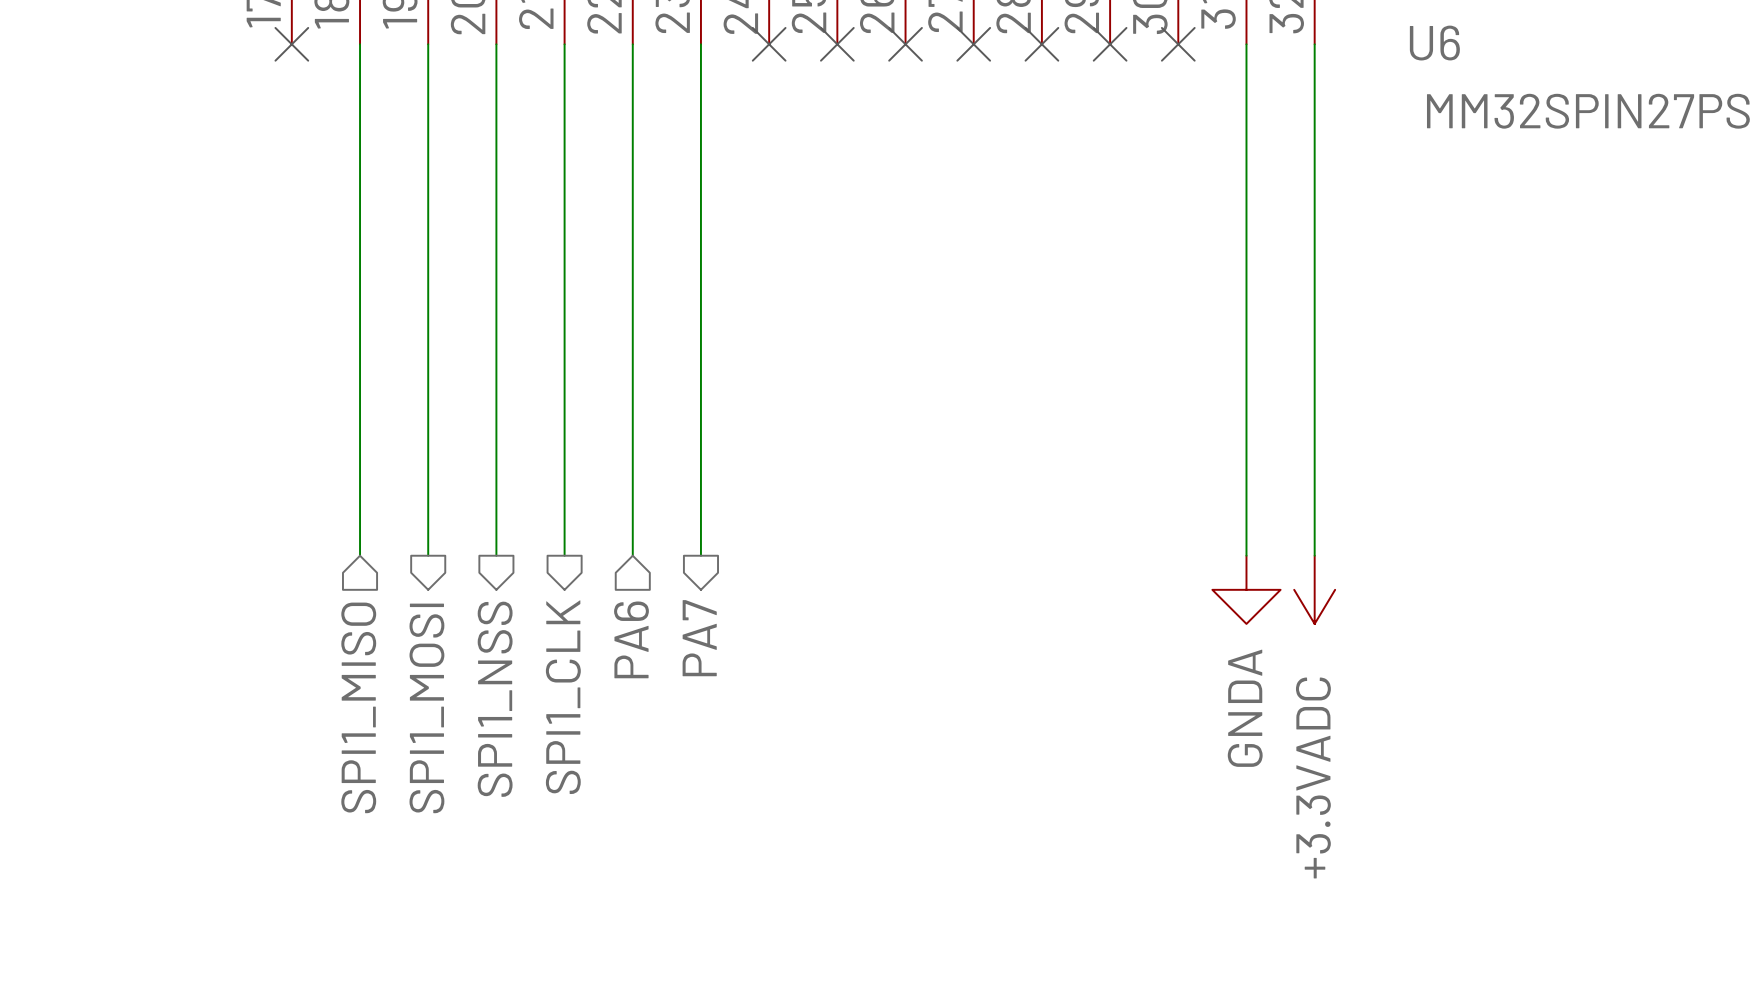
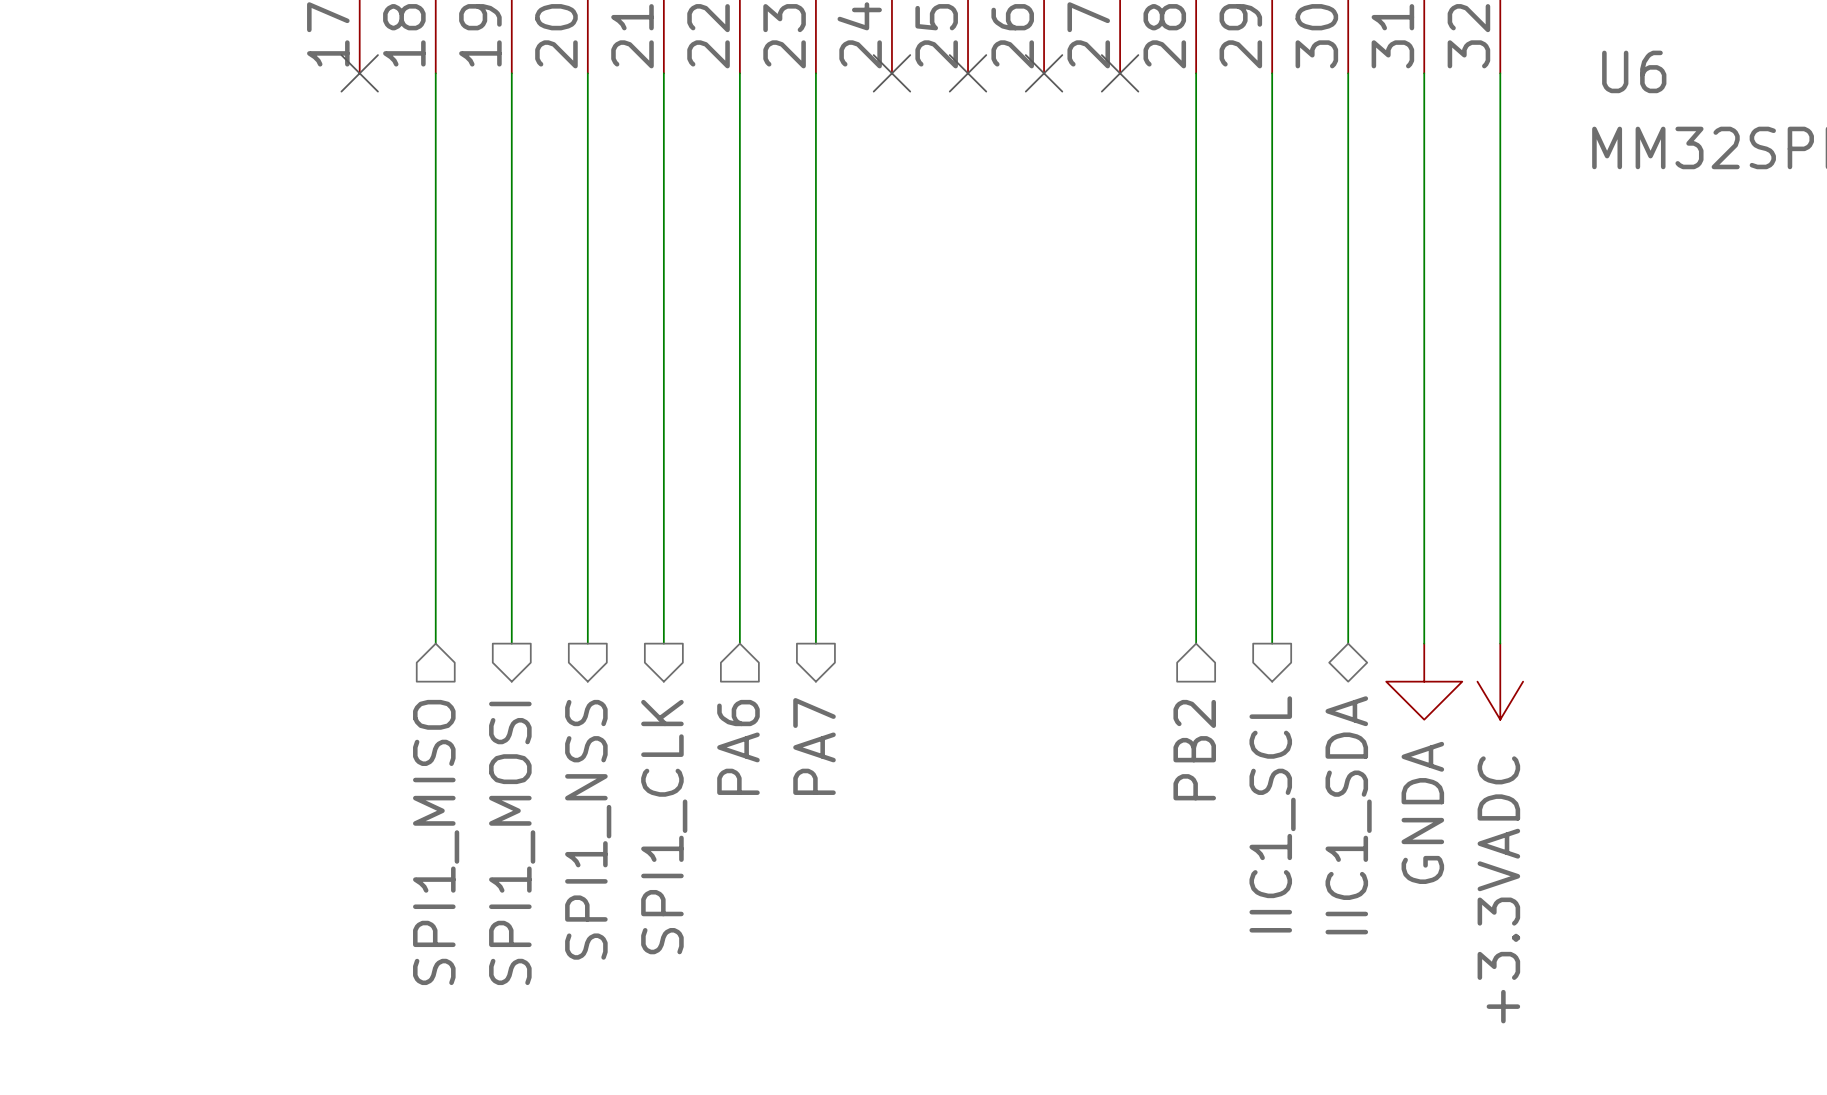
wire: none -> (1196, 73) (1196, 643)
no-connect mark: (1041, 44) -> none
wire: none -> (1272, 73) (1272, 643)
no-connect mark: (1110, 44) -> none
wire: none -> (1348, 73) (1348, 643)
no-connect mark: (1178, 44) -> none
hierarchical label: none -> PB2 (1194, 750)
hierarchical label: none -> IIC1_SCL (1272, 814)
hierarchical label: none -> IIC1_SDA (1348, 815)

